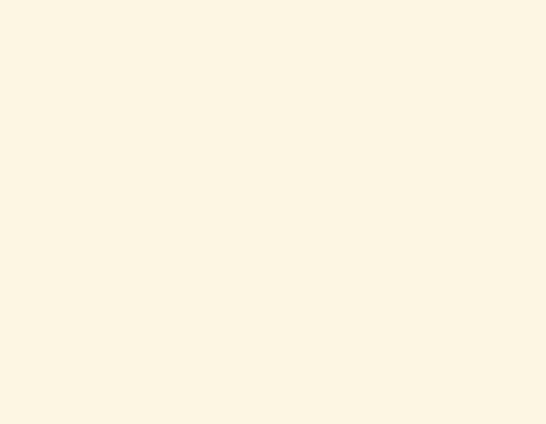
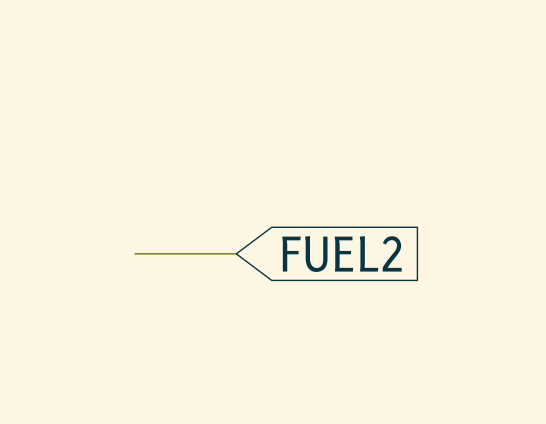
wire: none -> (135, 253) (236, 253)
global label: none -> FUEL2 (341, 254)

